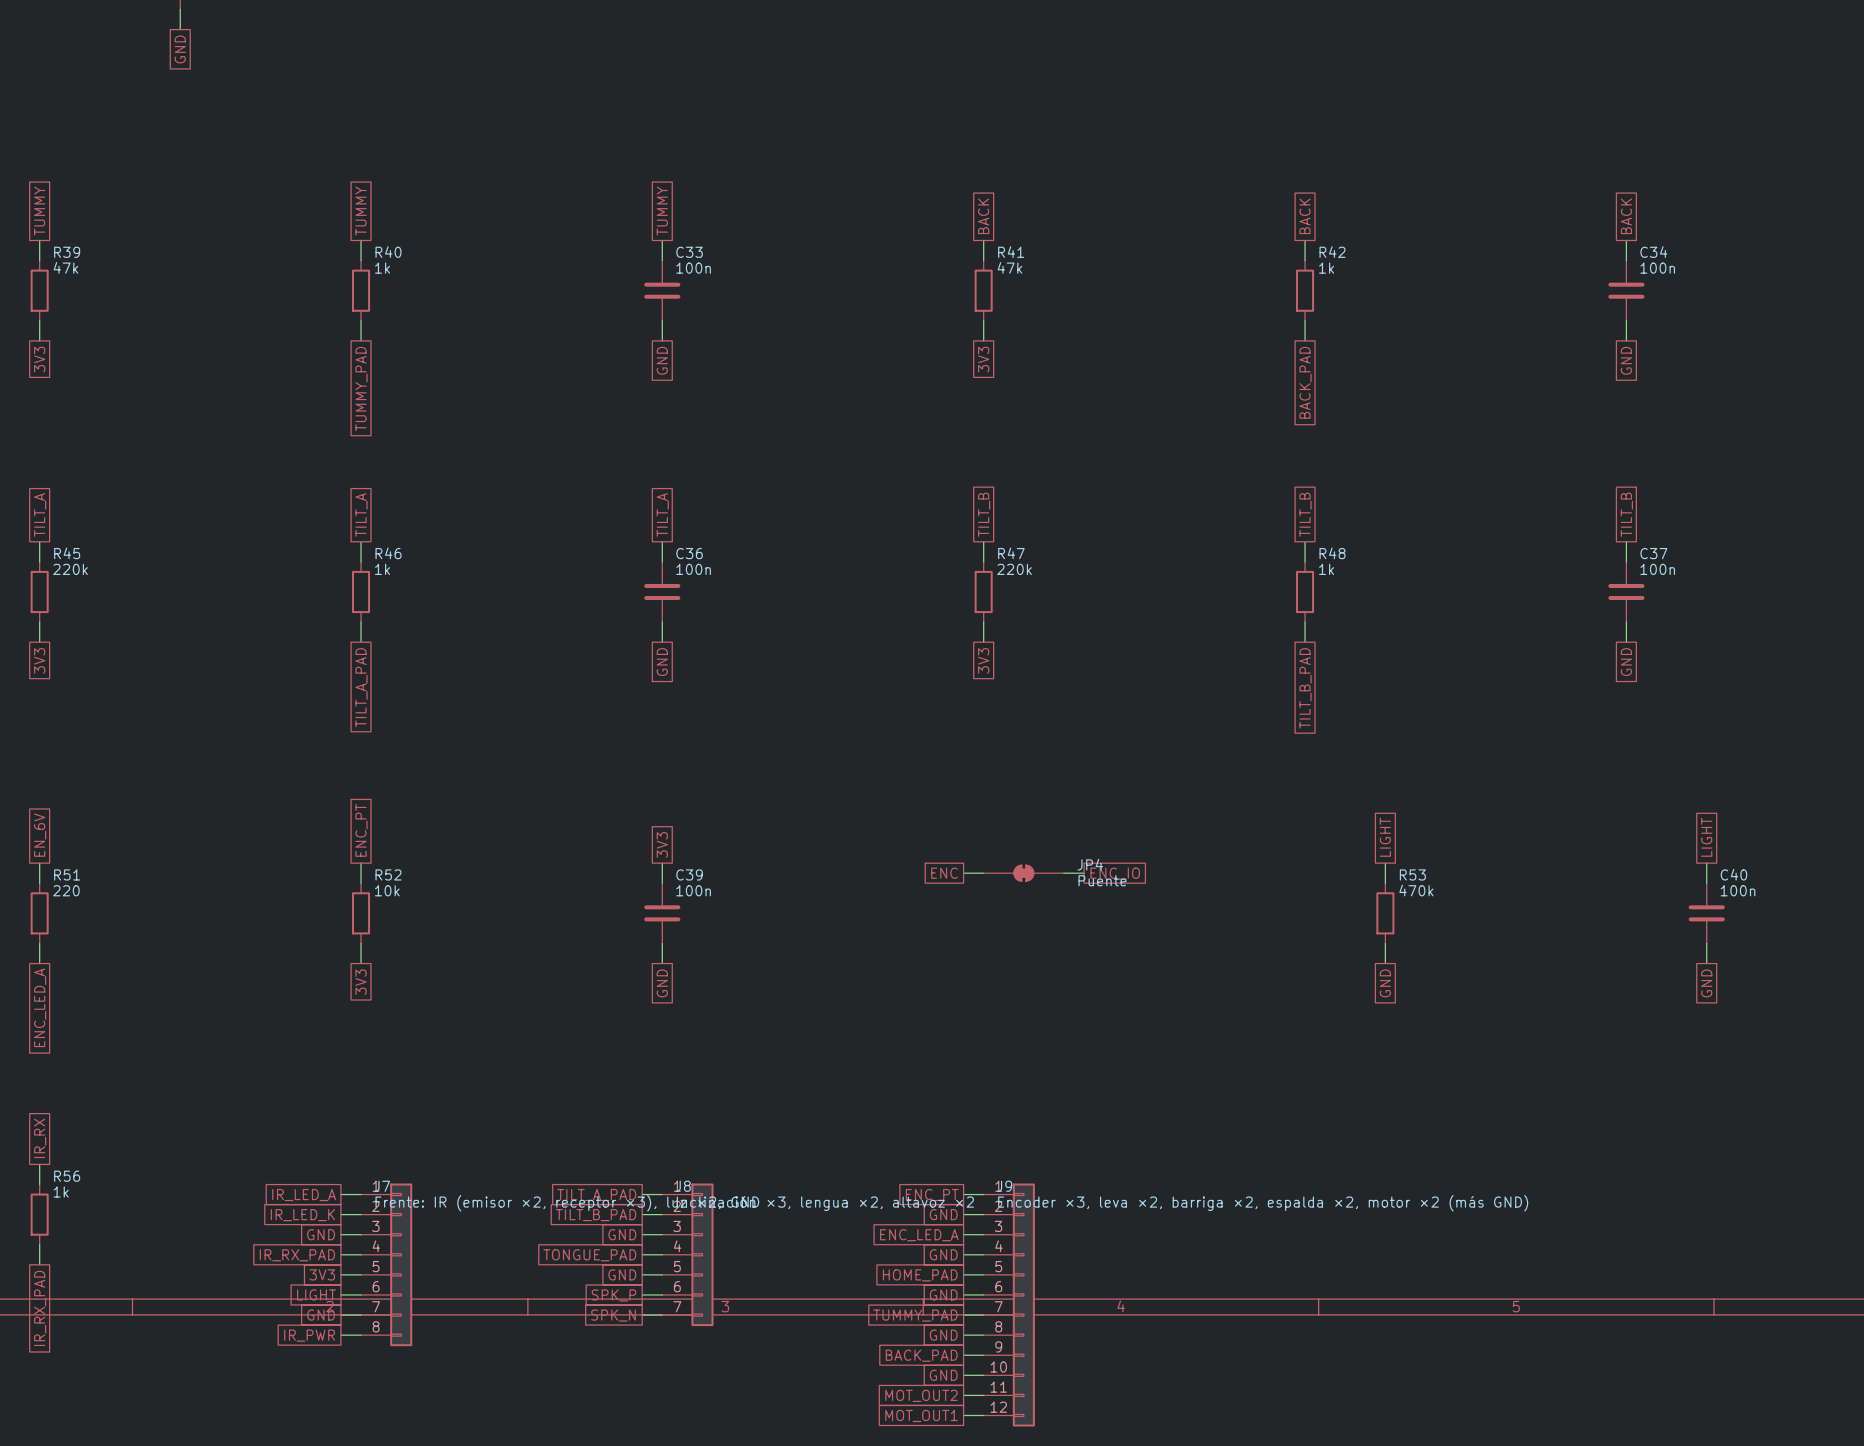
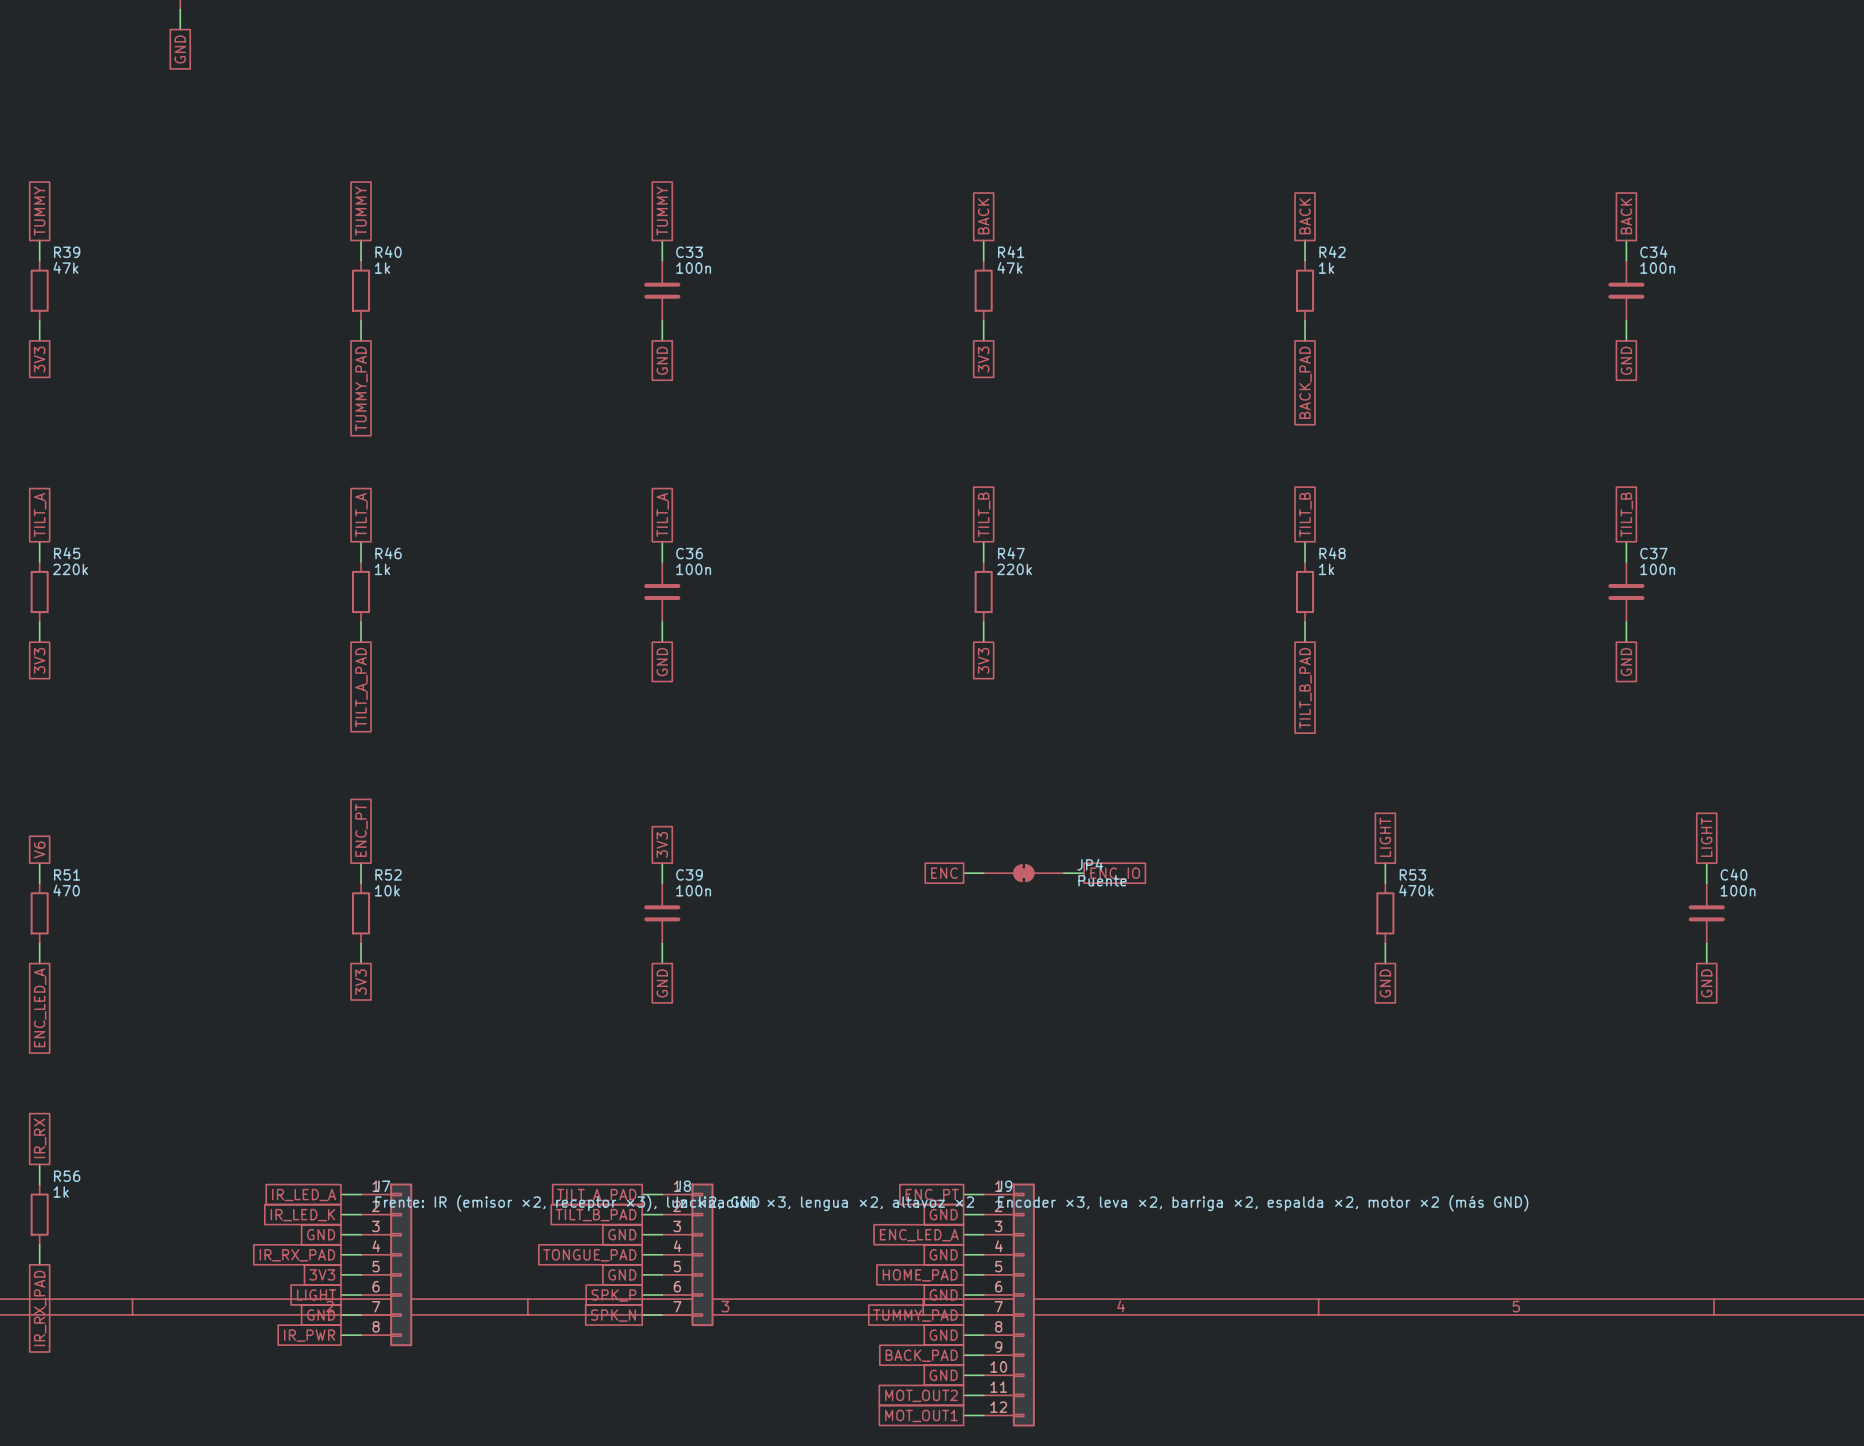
global label: EN_6V (40, 835) -> V6 (39, 849)
R51 value: 220 (66, 890) -> 470 (66, 890)

